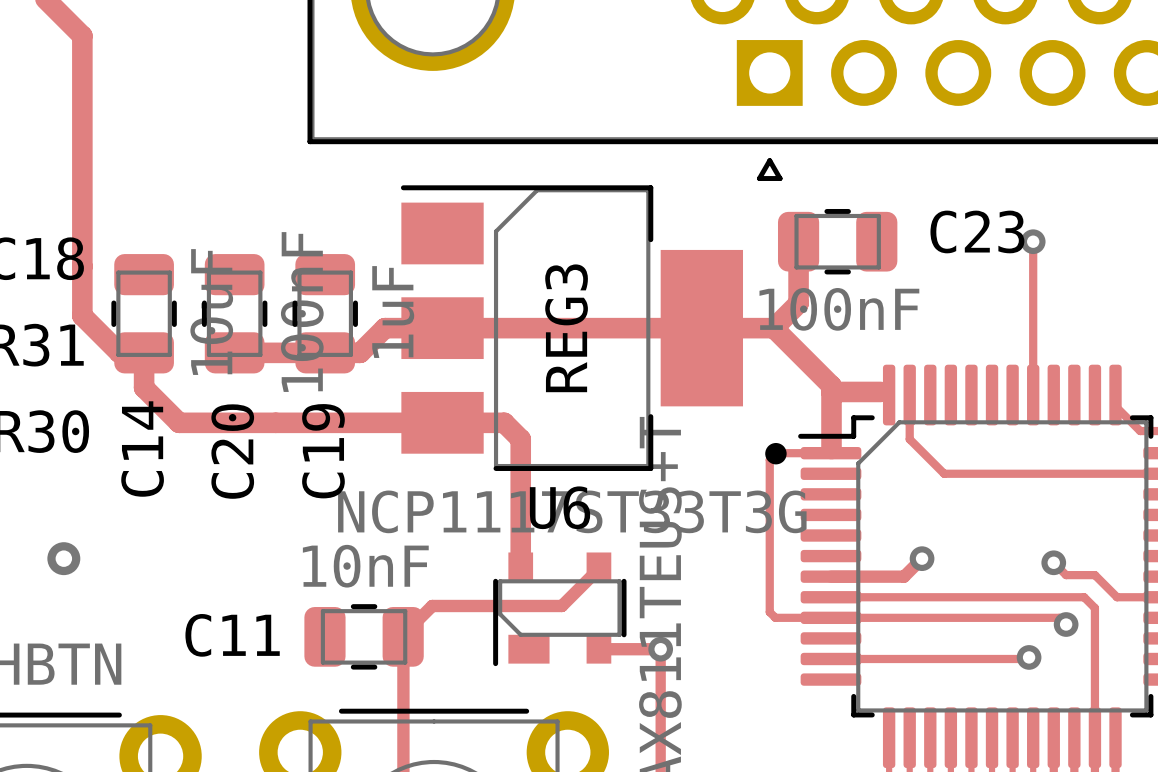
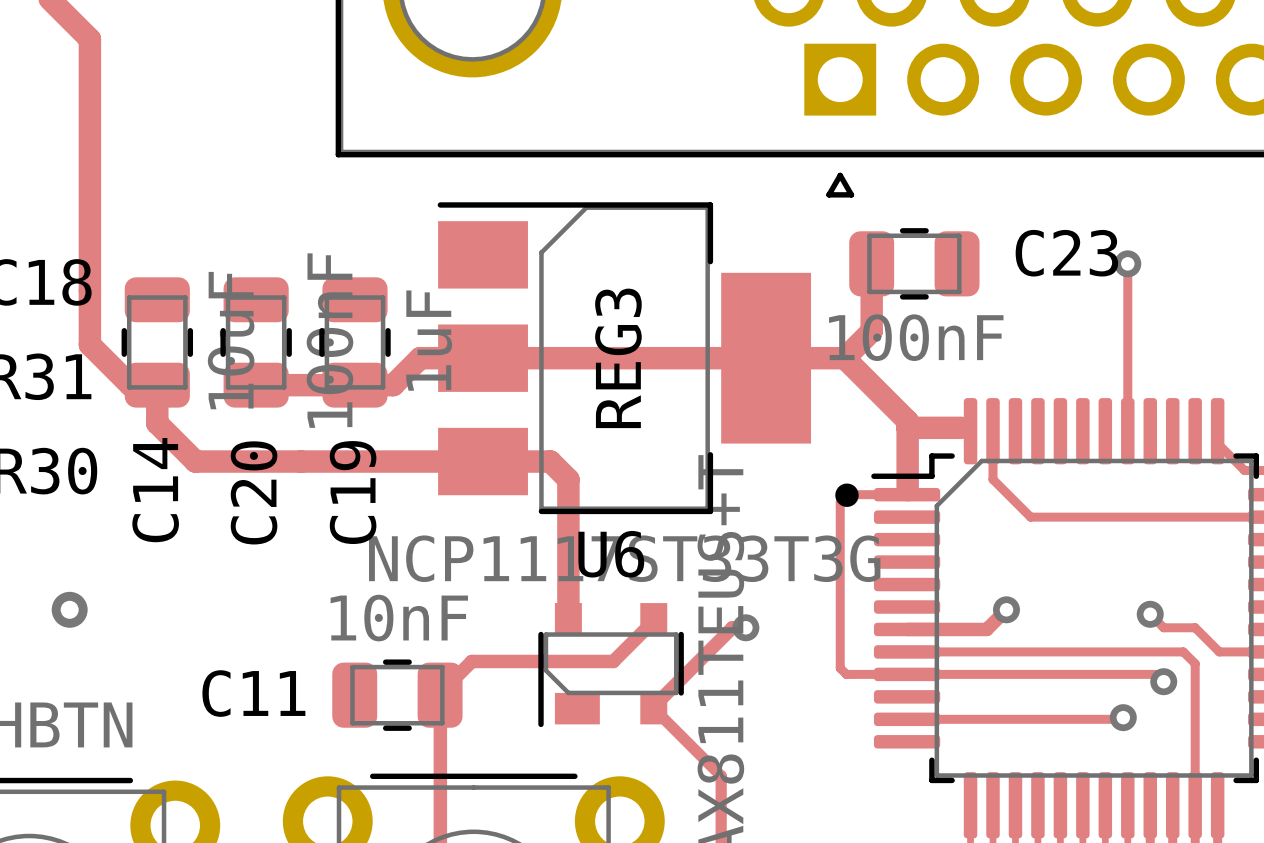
track: (598, 649) (660, 649) (660, 710) -> (745, 627) (732, 627) (653, 706) (653, 708) (721, 776)
via position: (660, 649) -> (745, 627)

